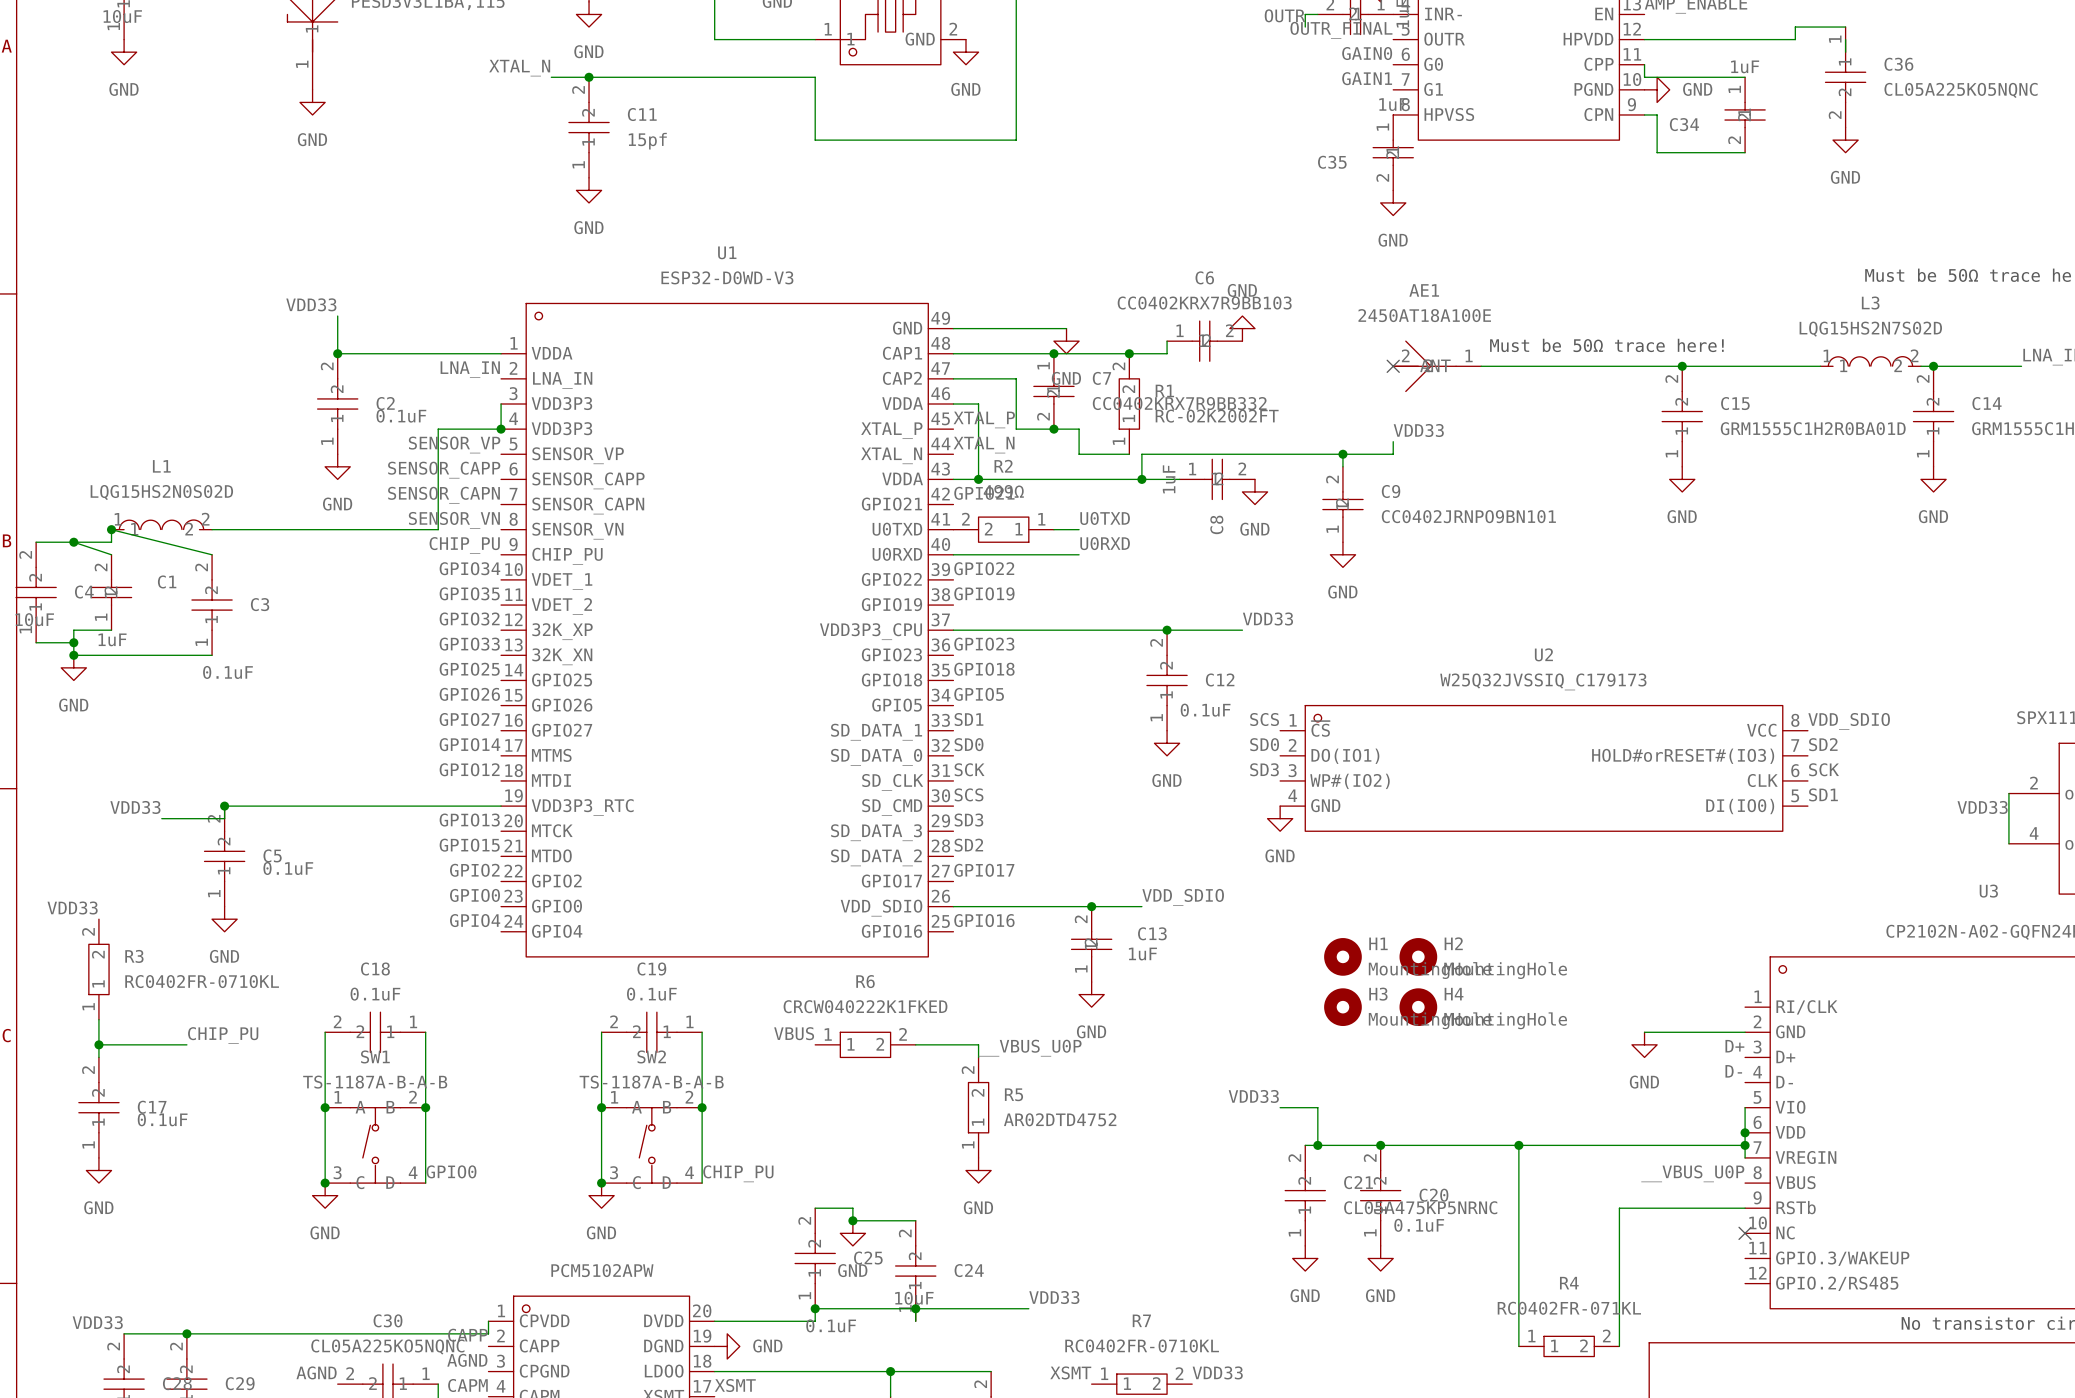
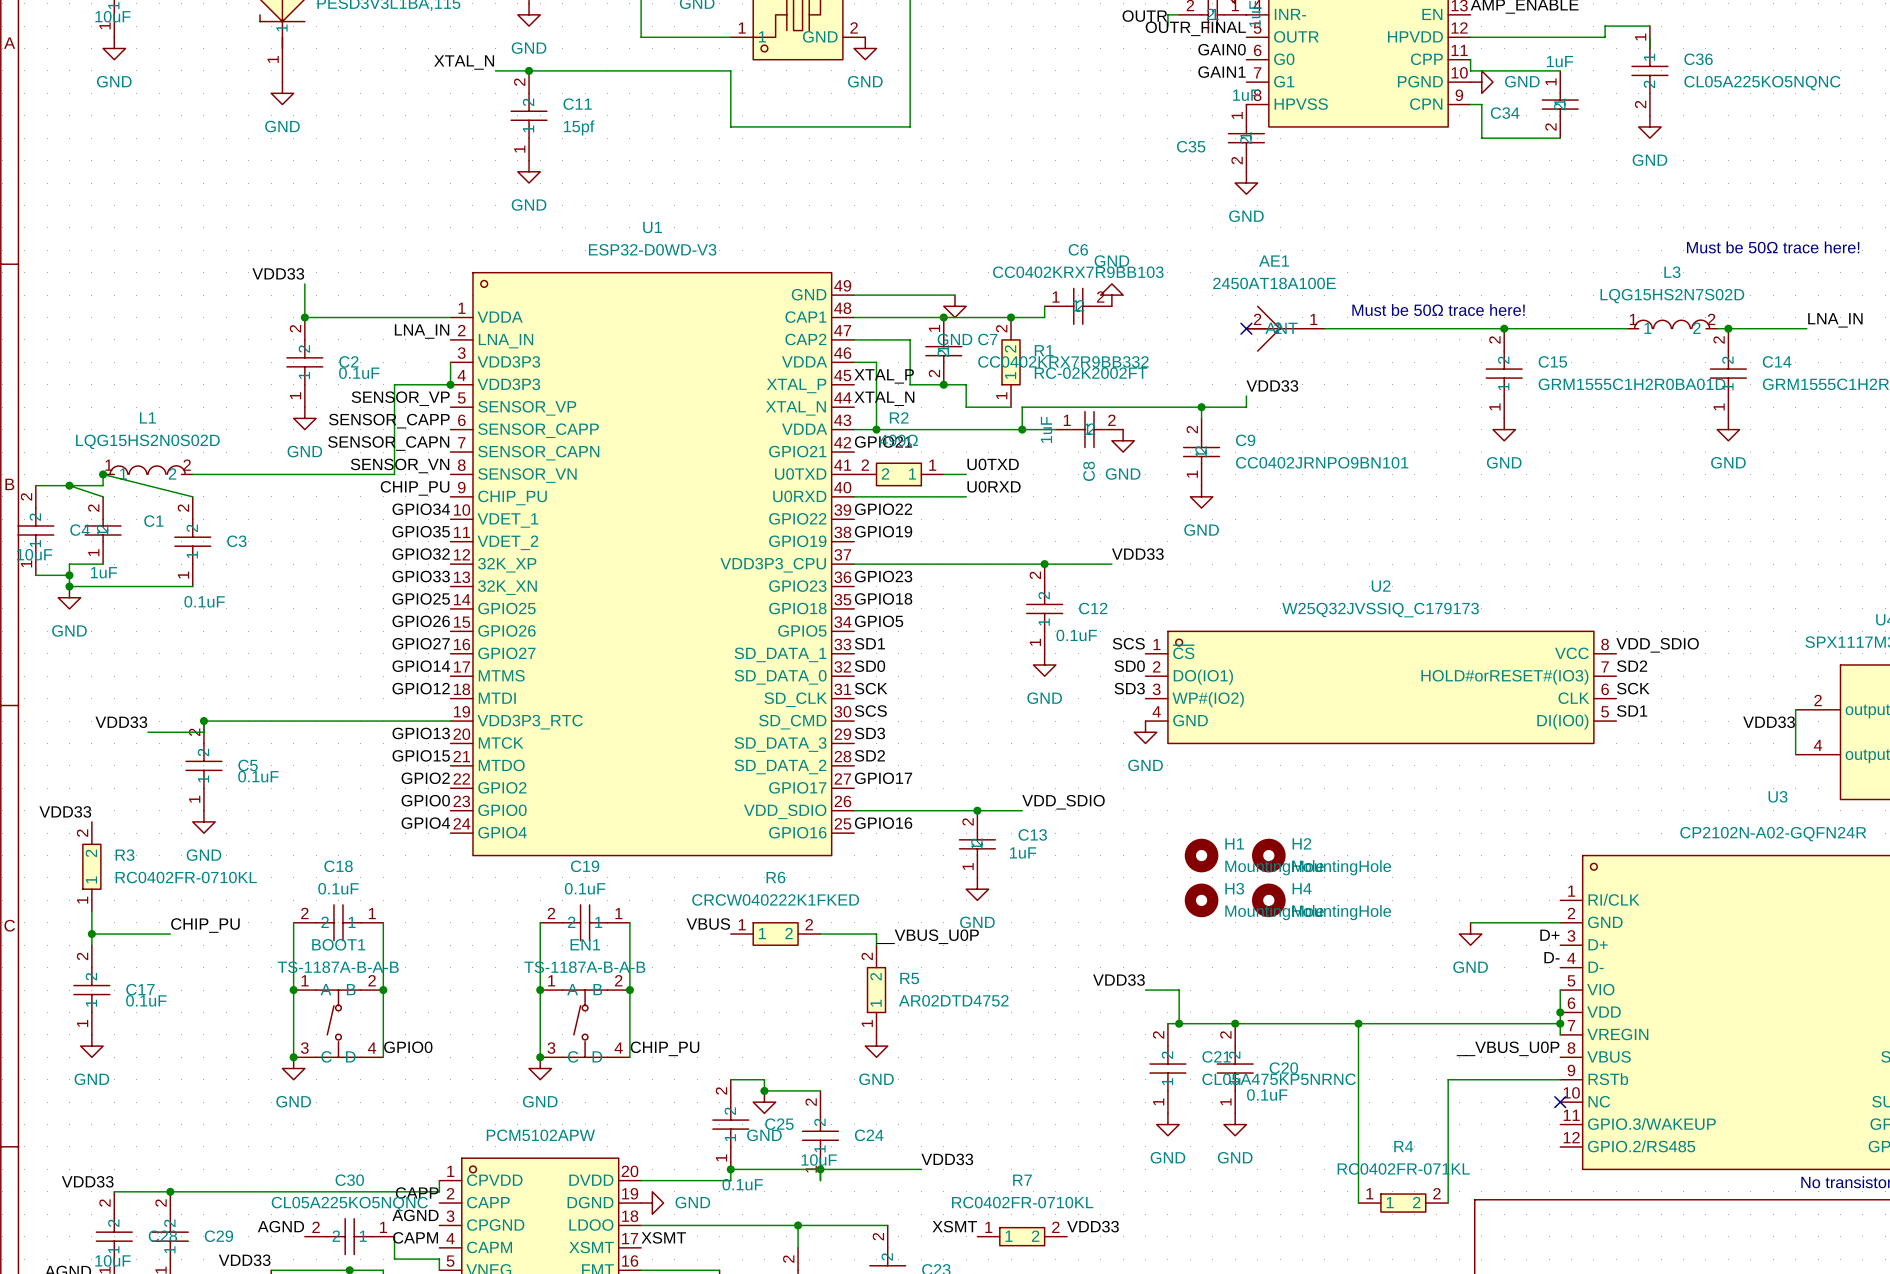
SW1 name: SW1 (375, 1056) -> BOOT1 (338, 944)
SW2 name: SW2 (651, 1056) -> EN1 (585, 944)

